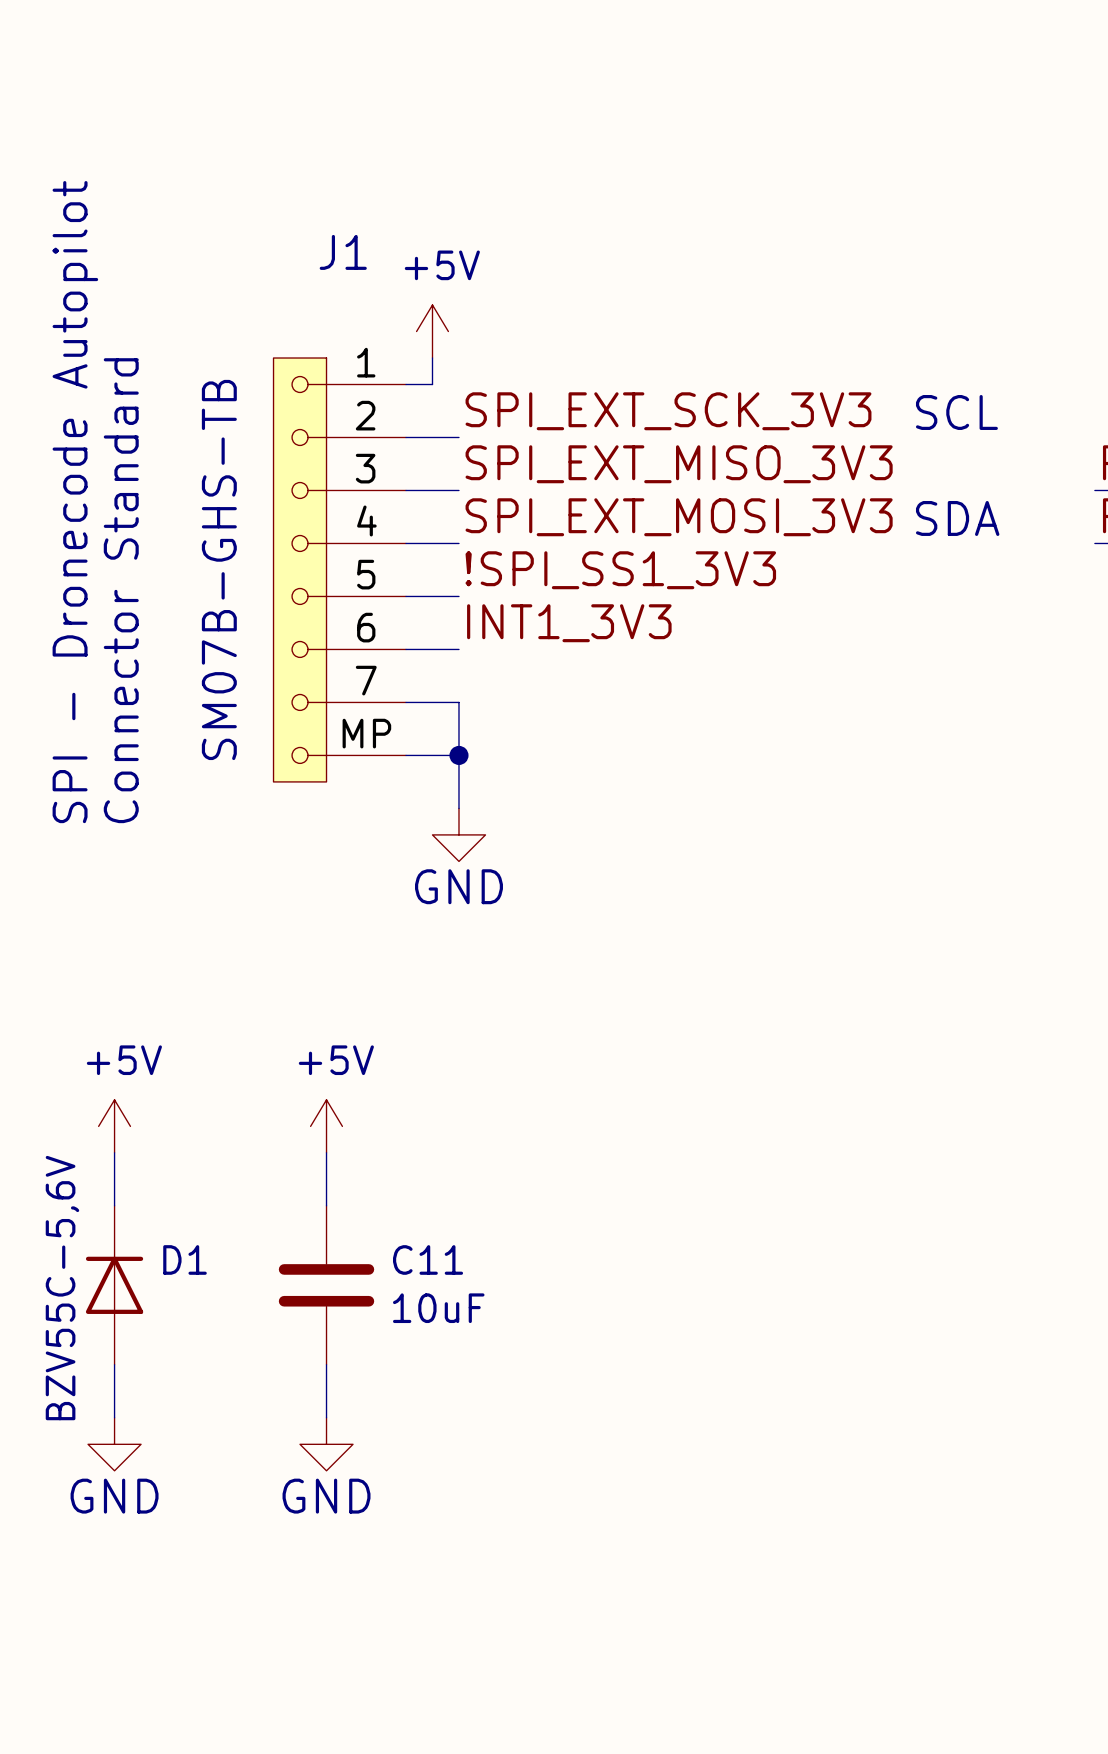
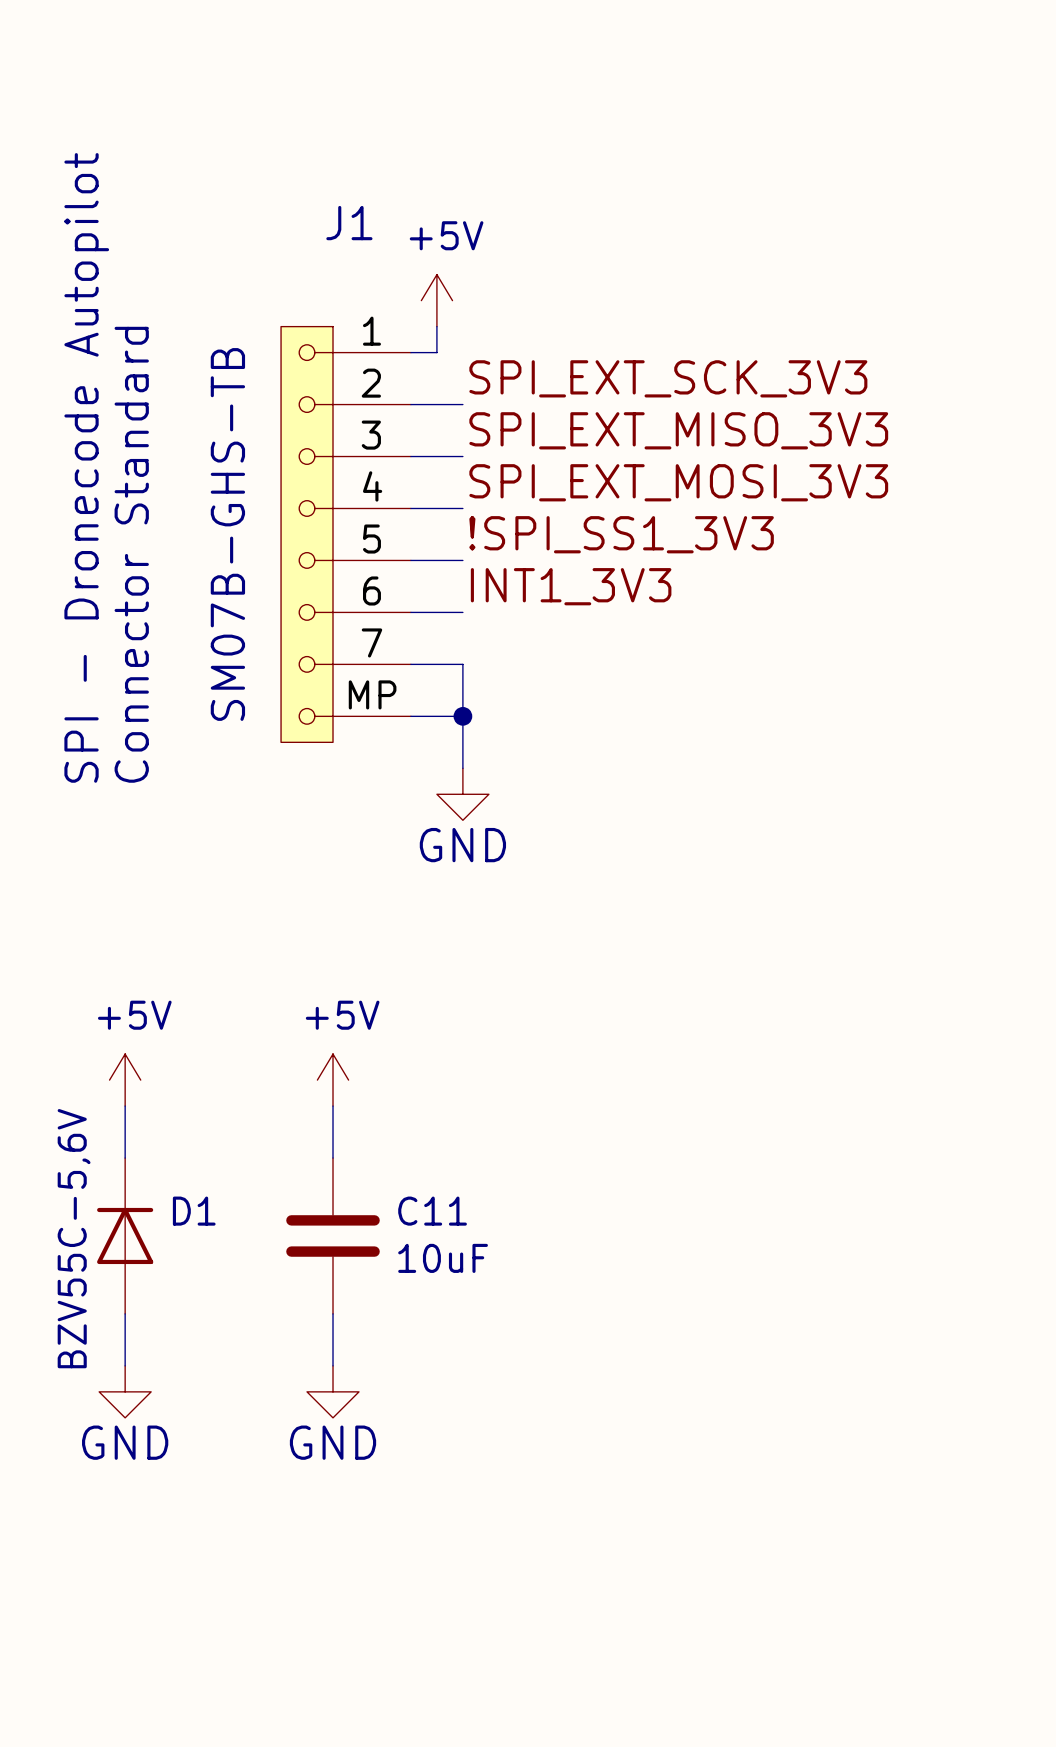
text: SCL (956, 412) -> none
text: SDA (957, 518) -> none

